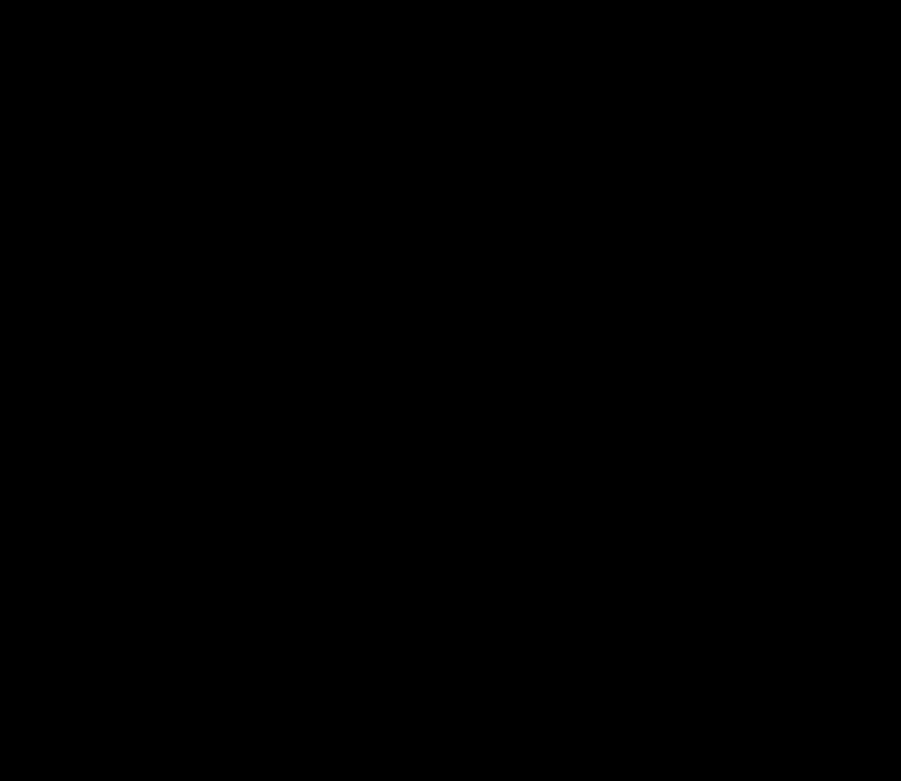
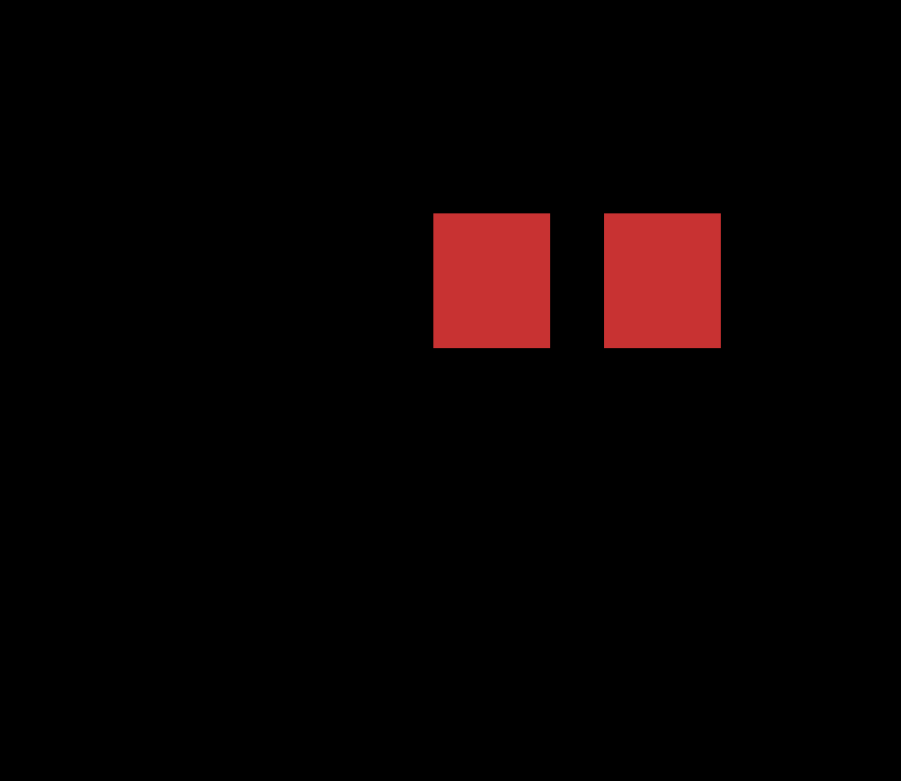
part: none -> (577, 280)

